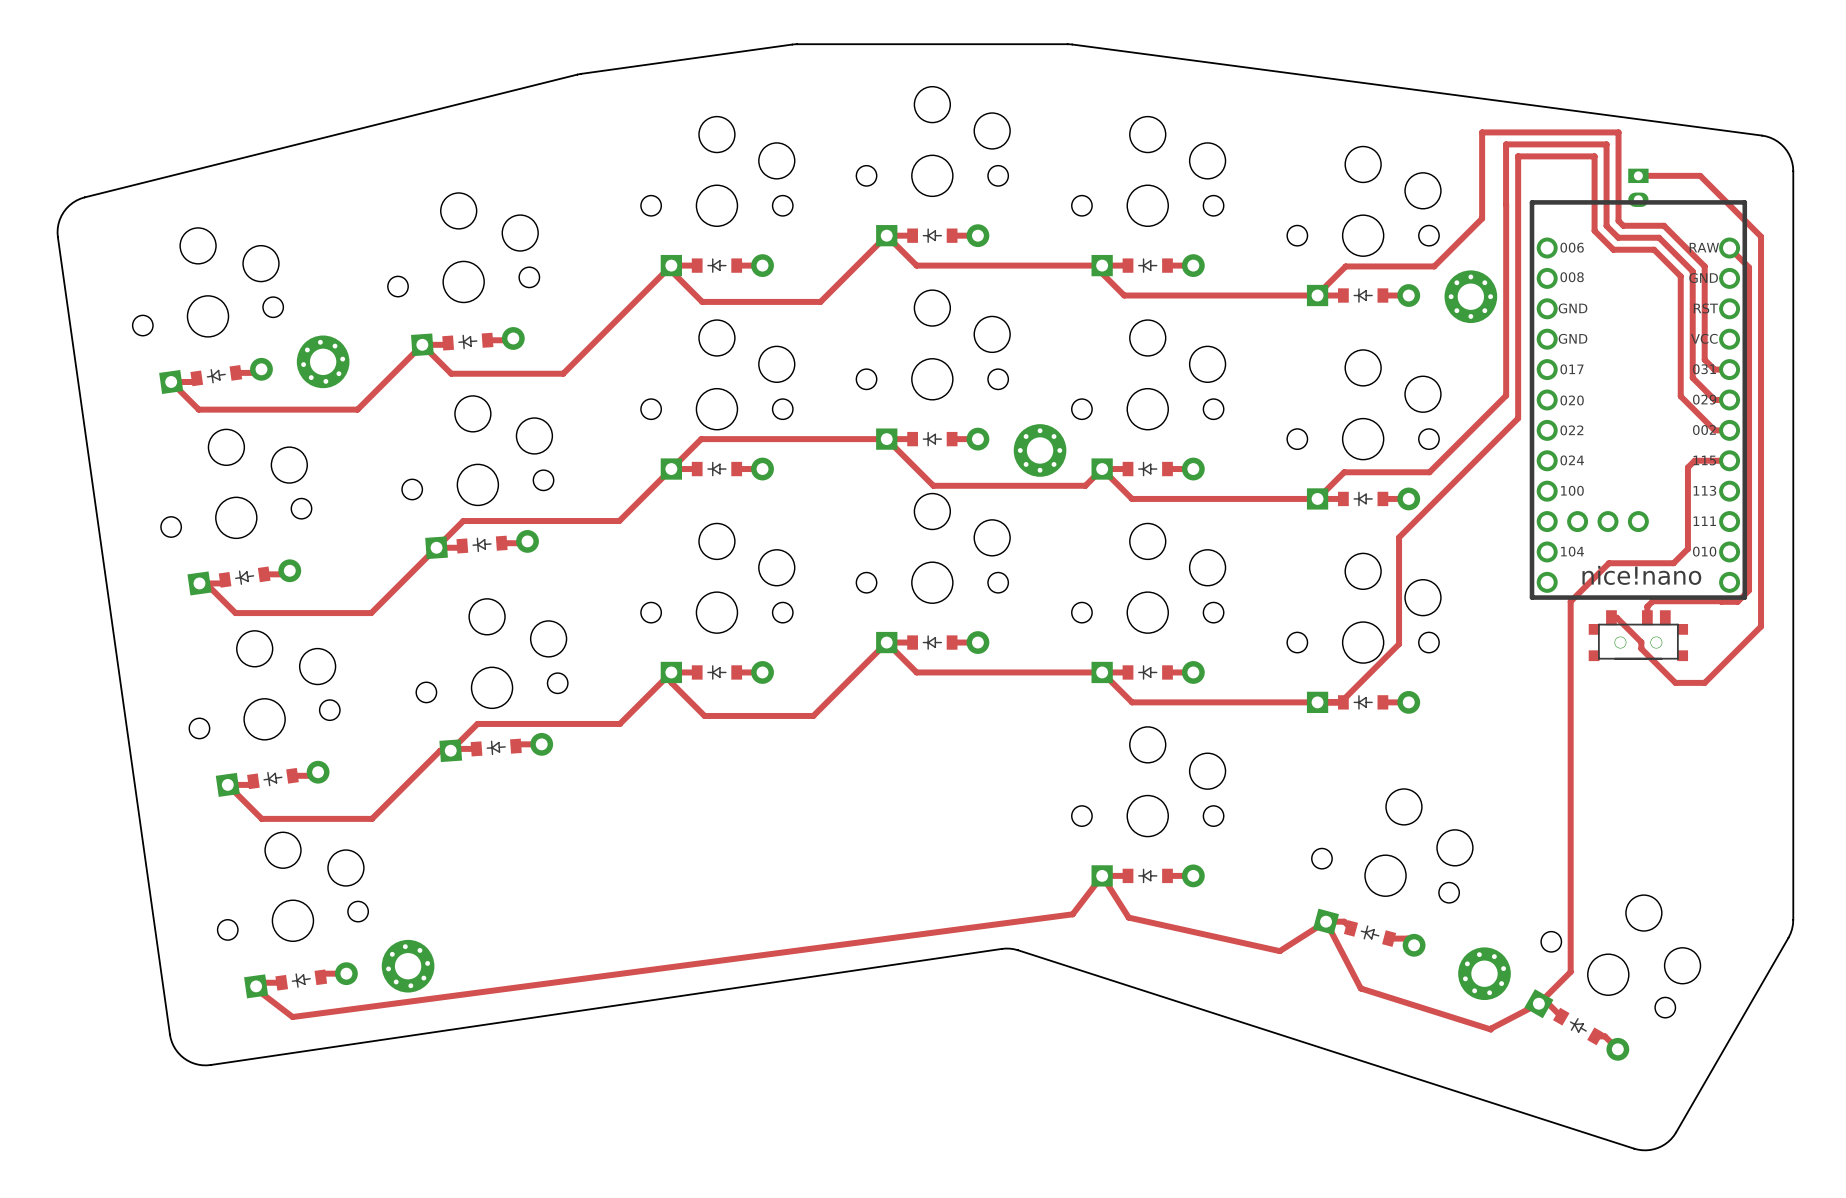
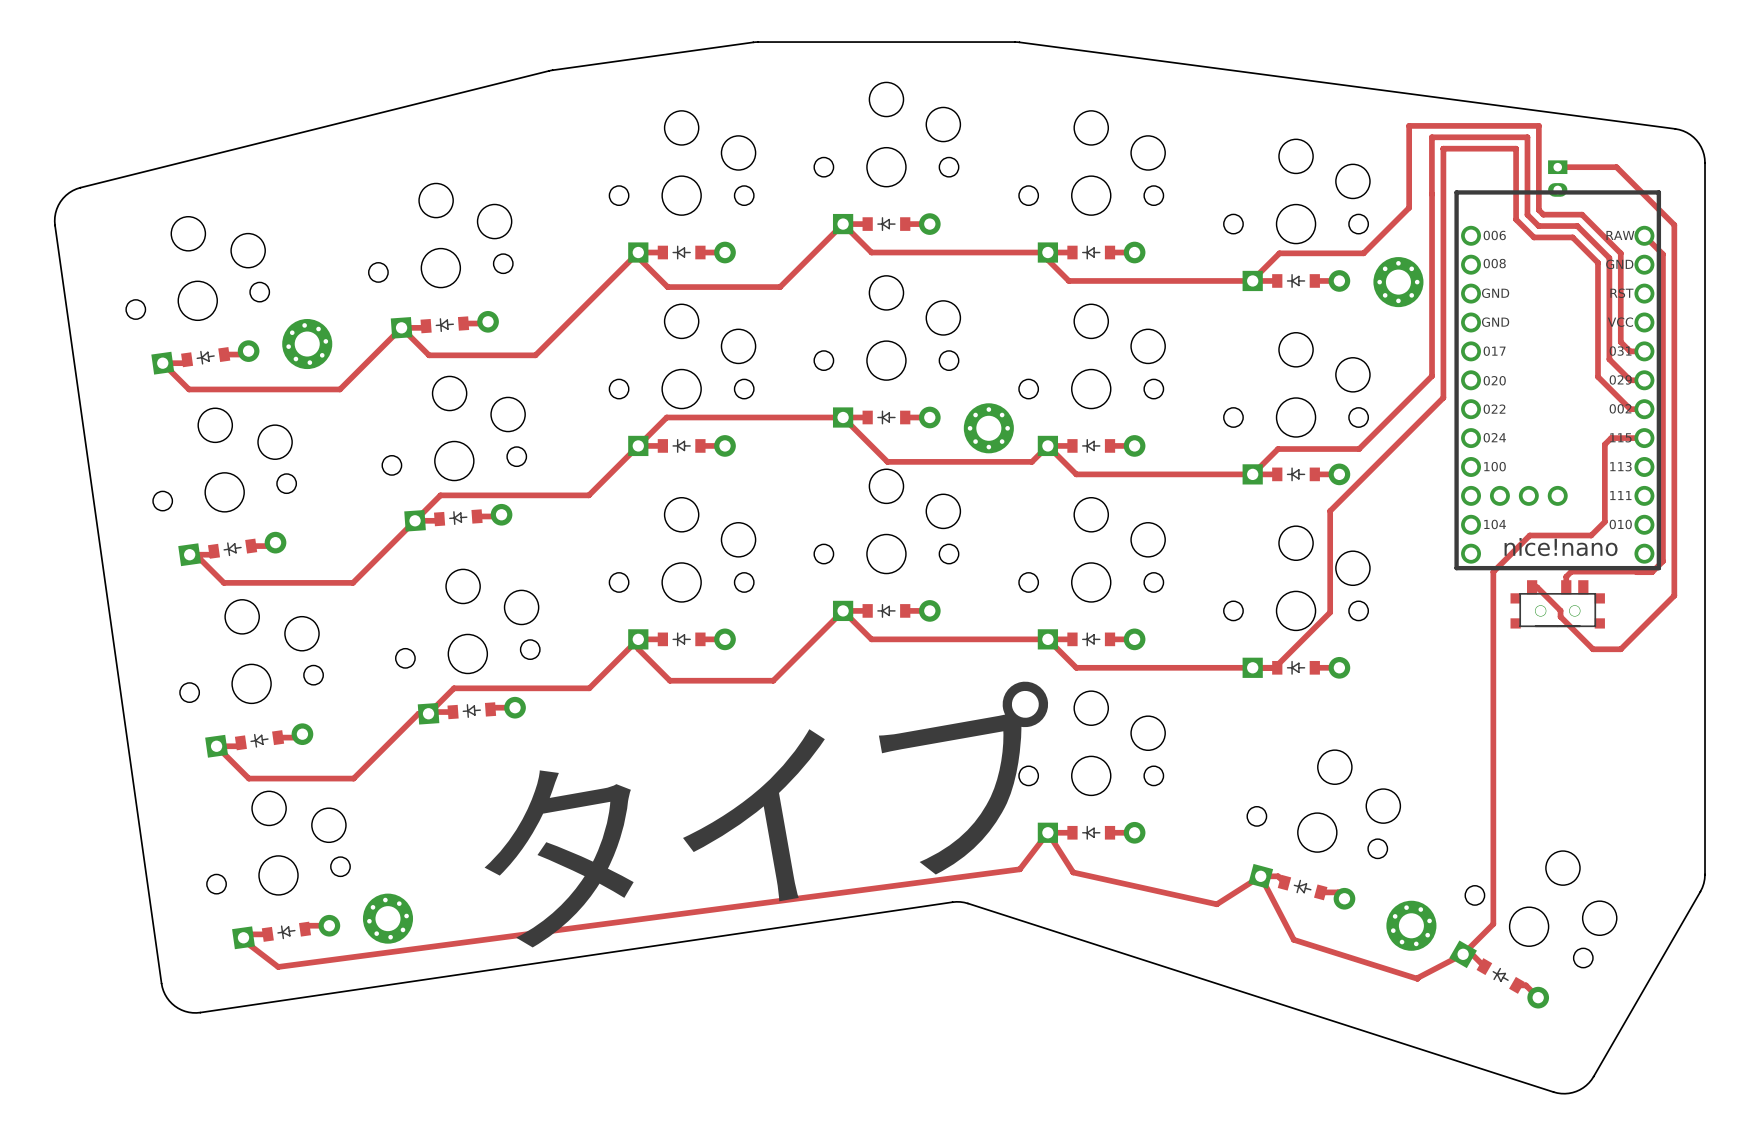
text: none -> タイプ (767, 813)

